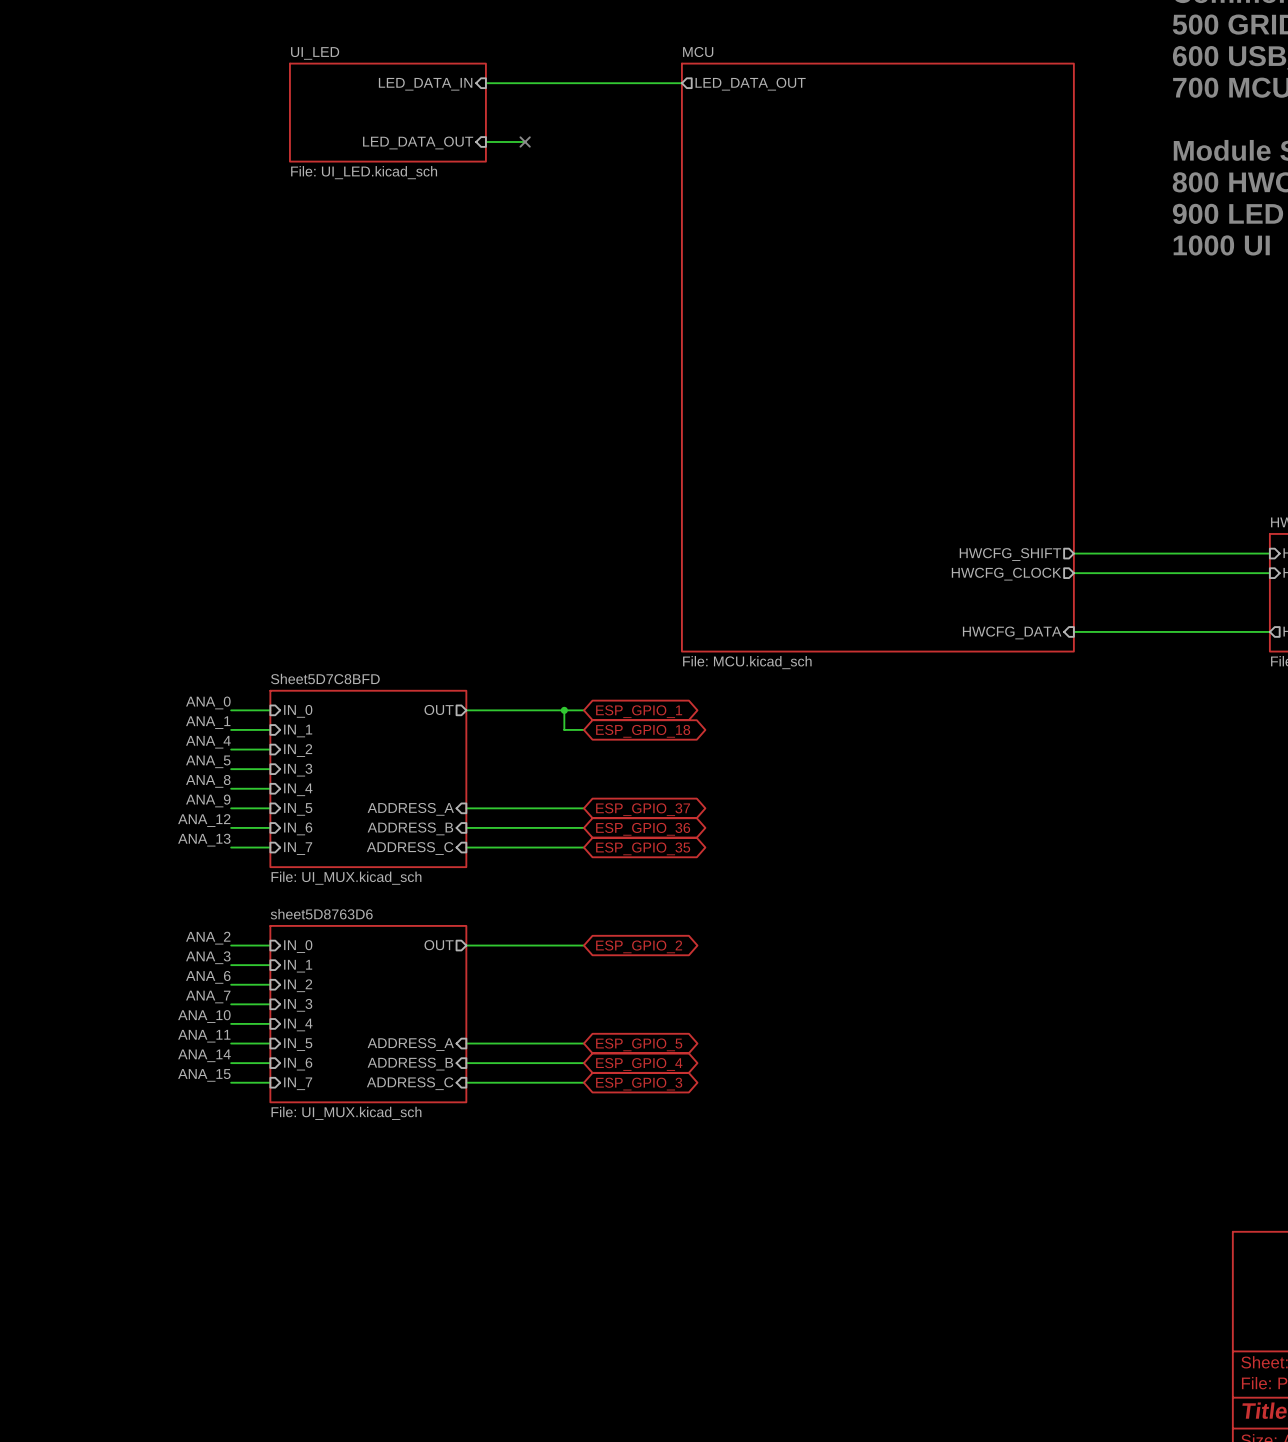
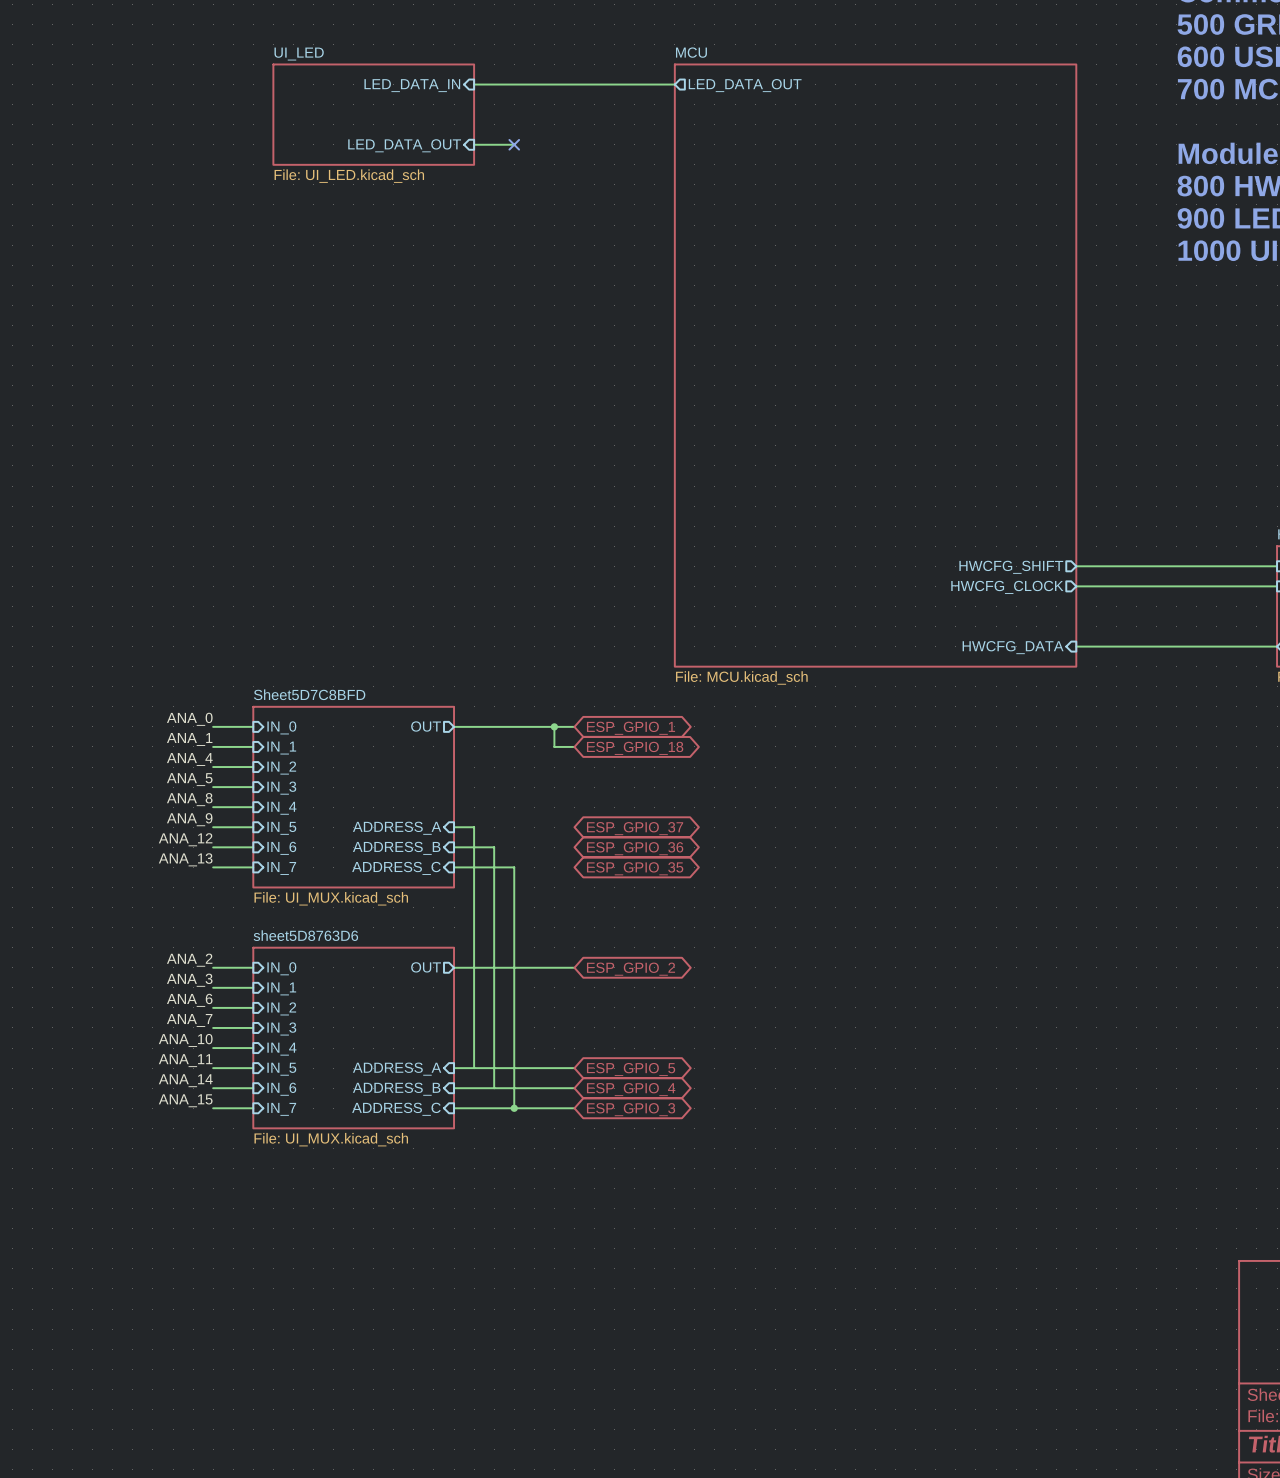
wire: (485, 808) (583, 808) -> (474, 827) (474, 1068)
wire: (505, 827) (583, 827) -> (494, 847) (494, 1088)
wire: (525, 847) (583, 847) -> (514, 867) (514, 1108)
junction: none -> (514, 1108)

